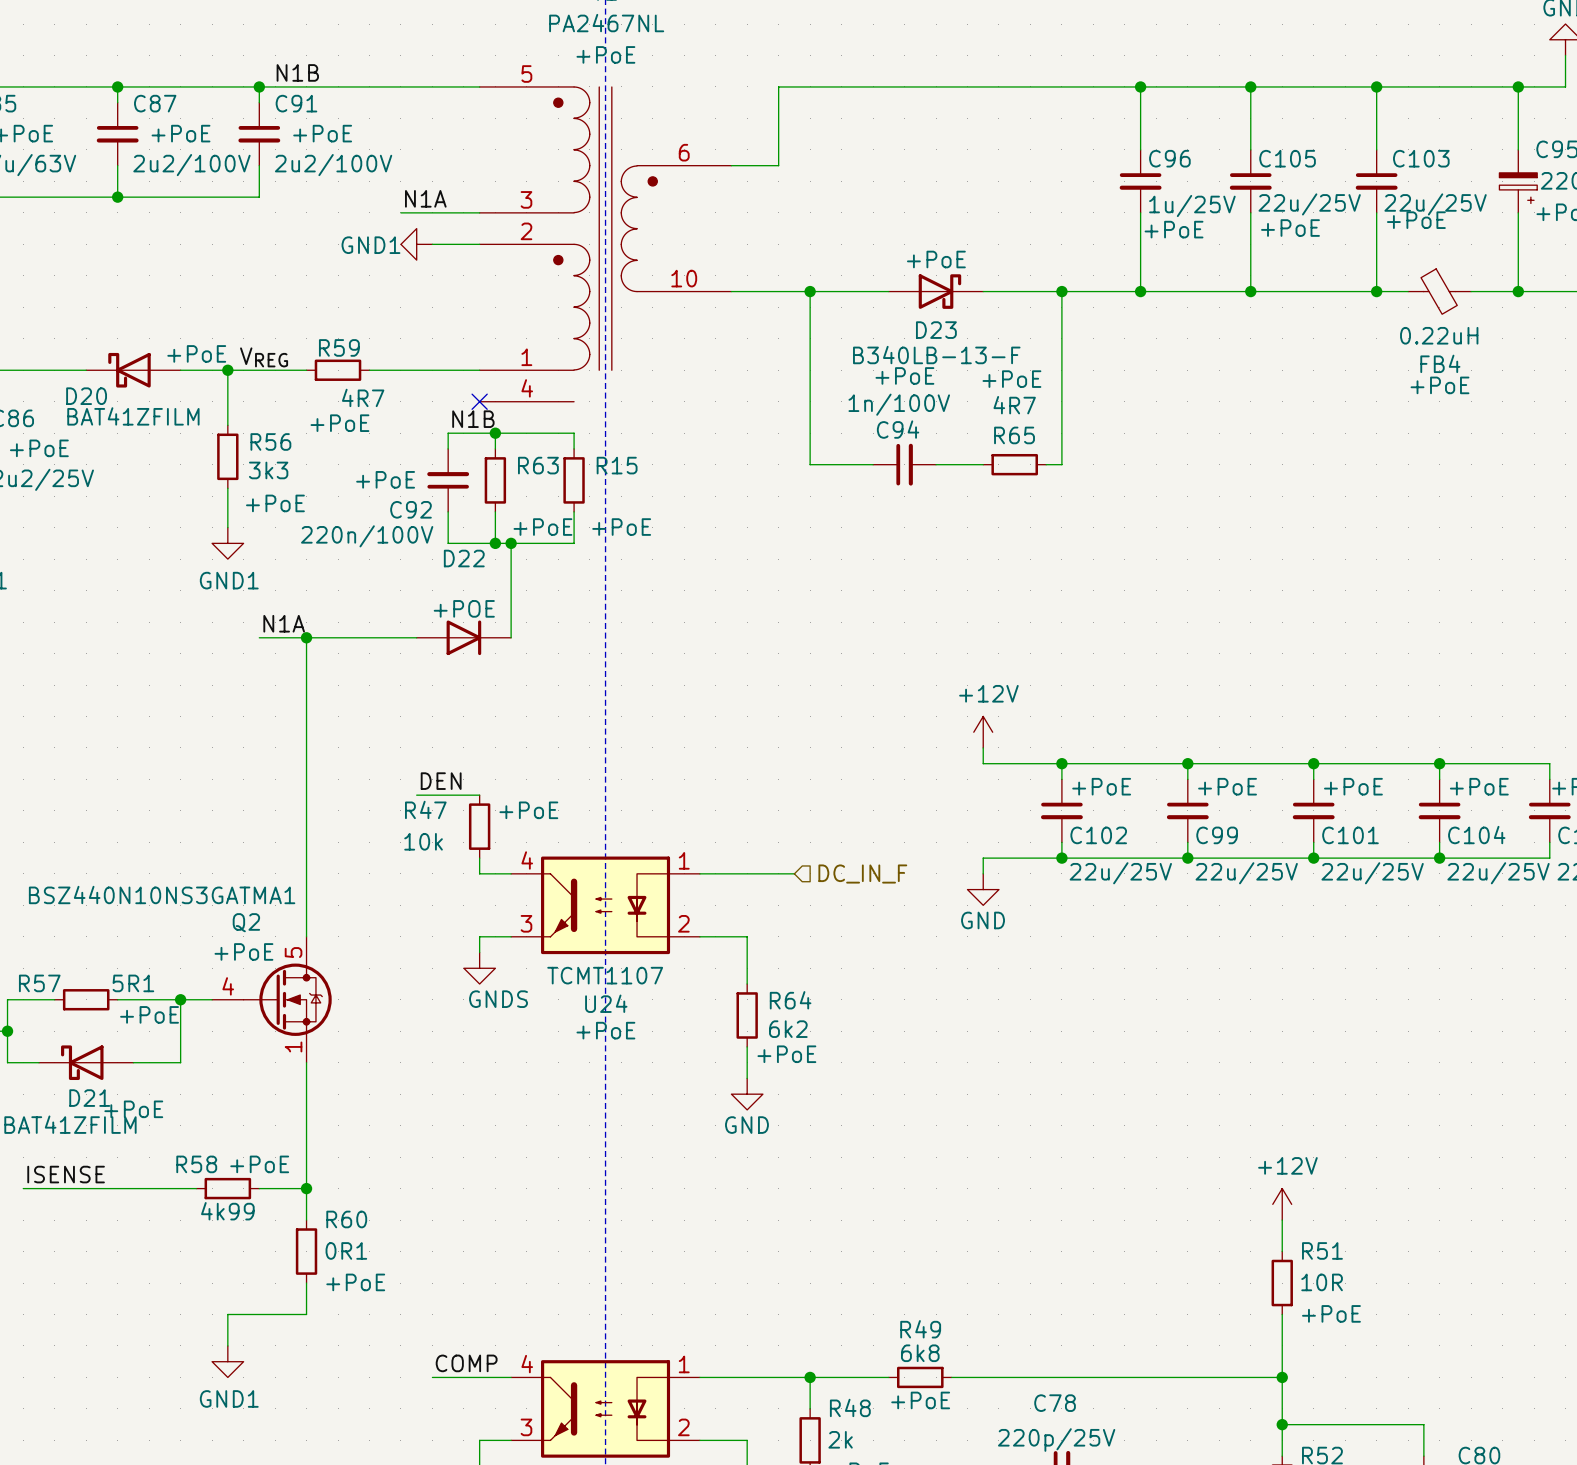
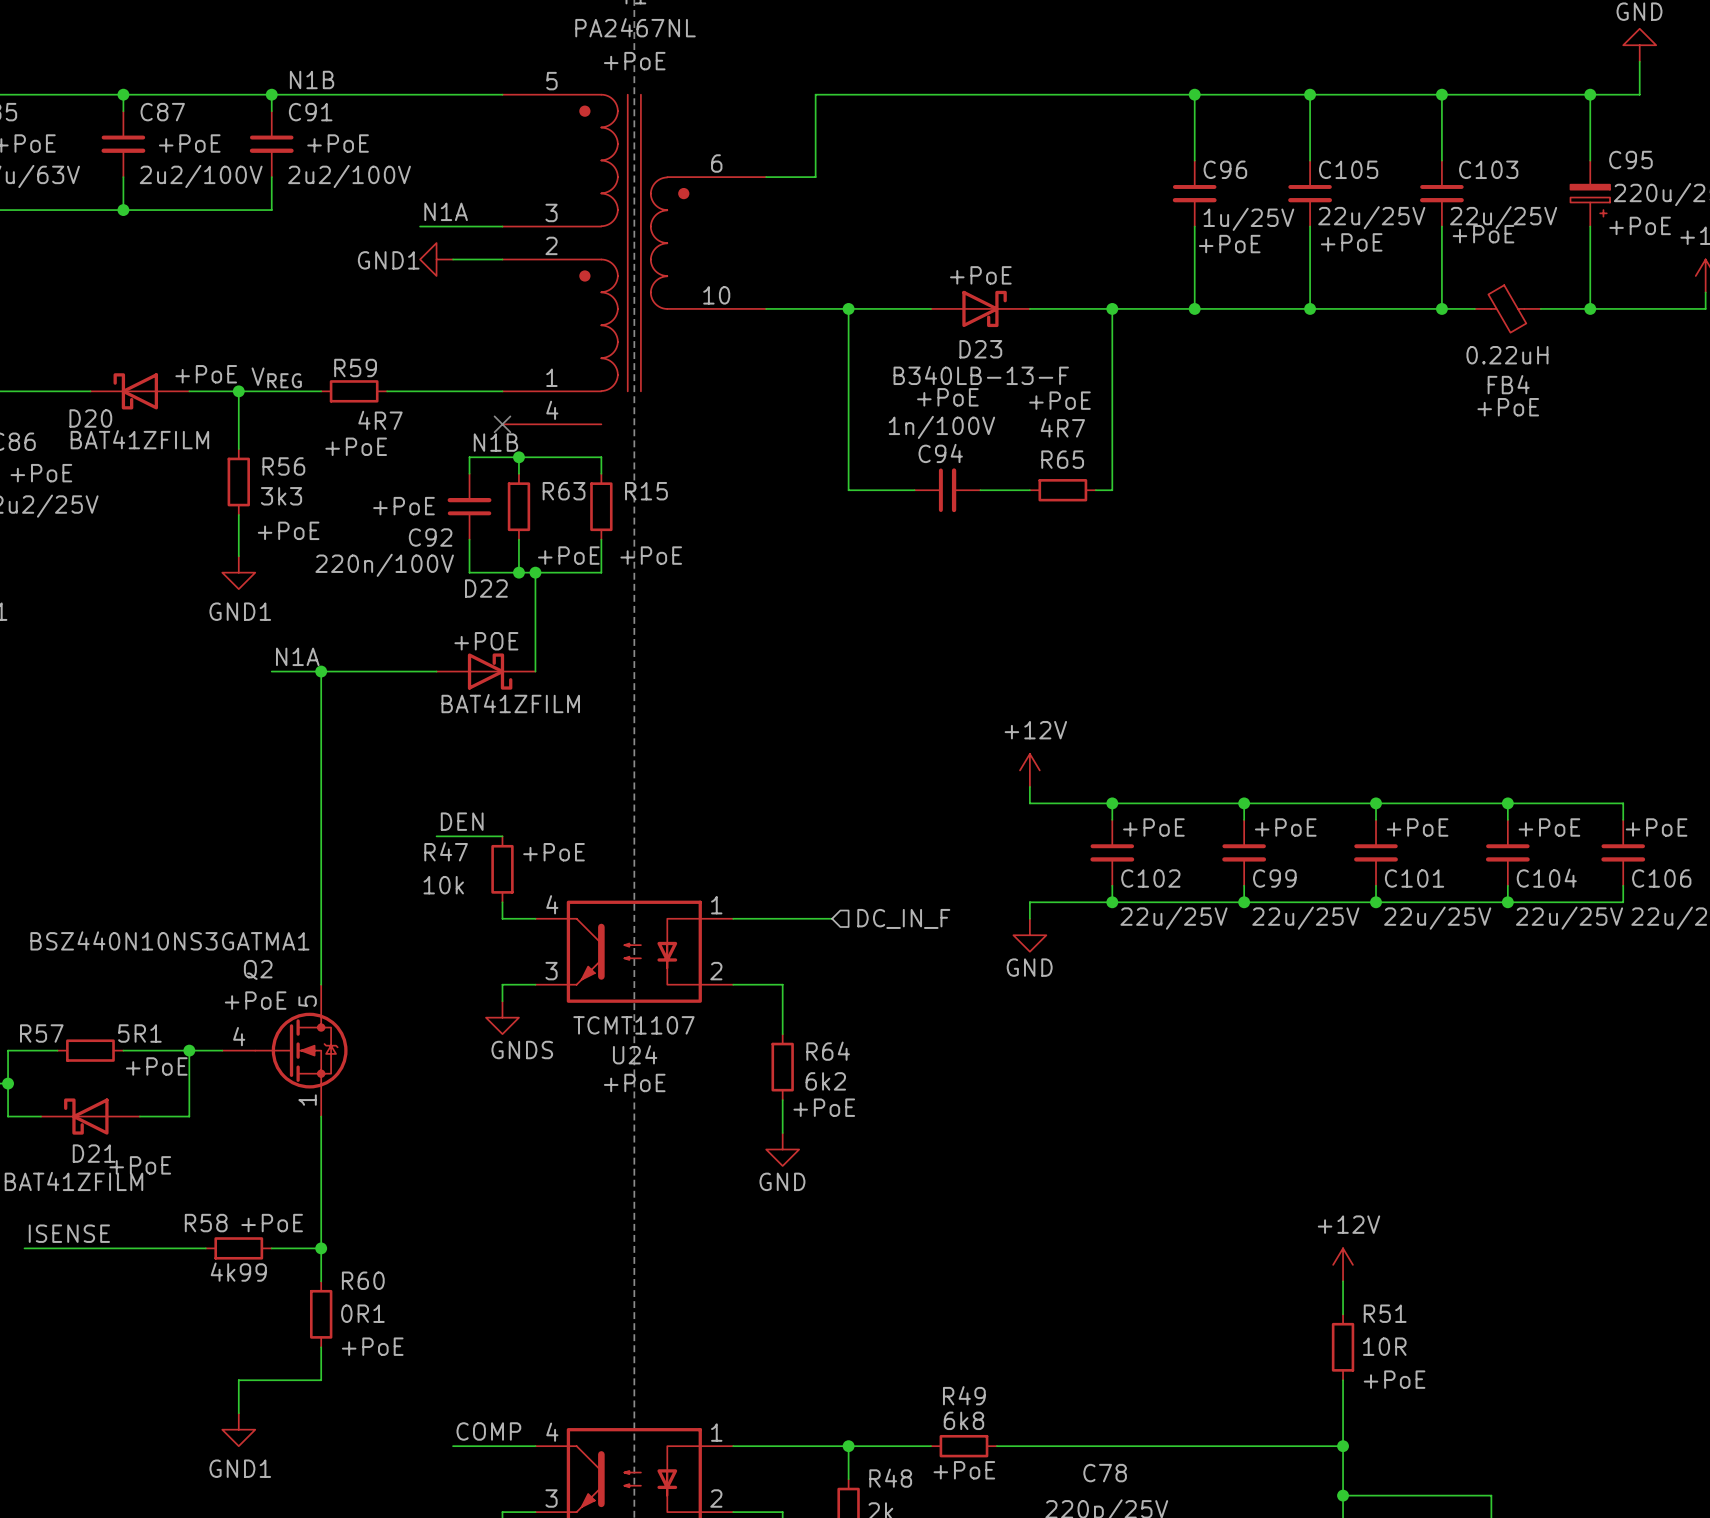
D22 symbol: [416, 620, 512, 656] -> [436, 653, 536, 690]
D22 value: none -> BAT41ZFILM (510, 703)

